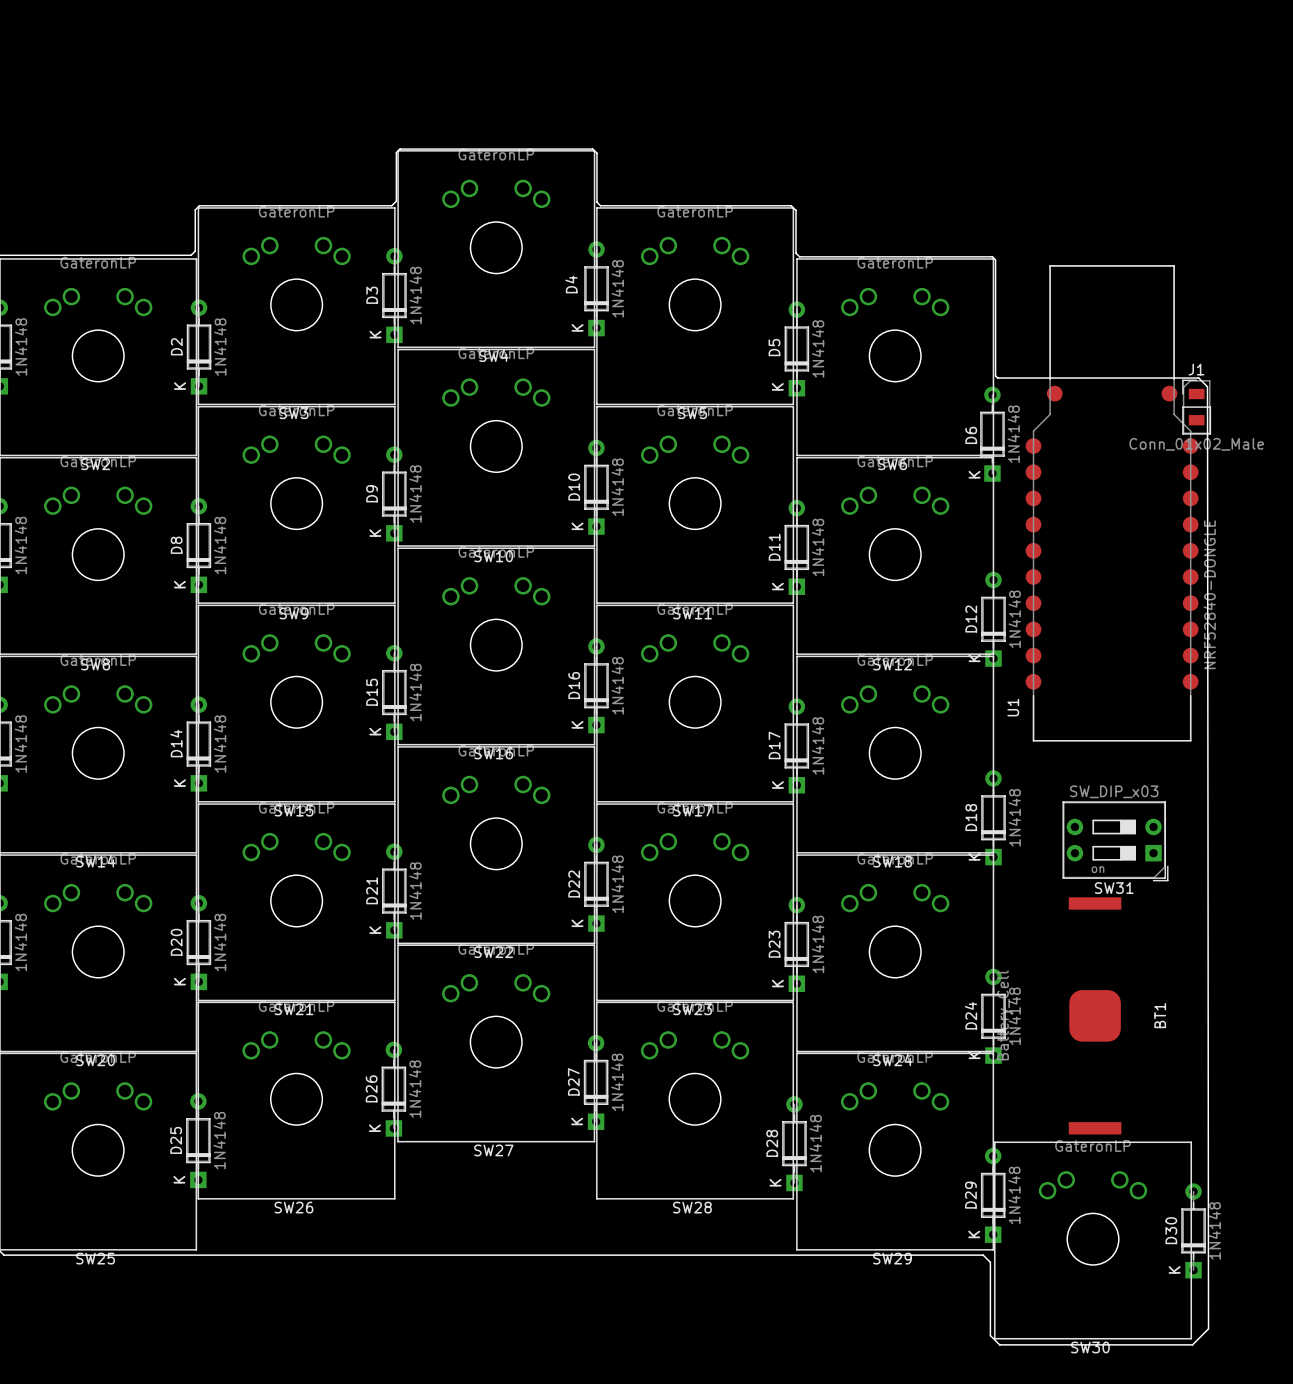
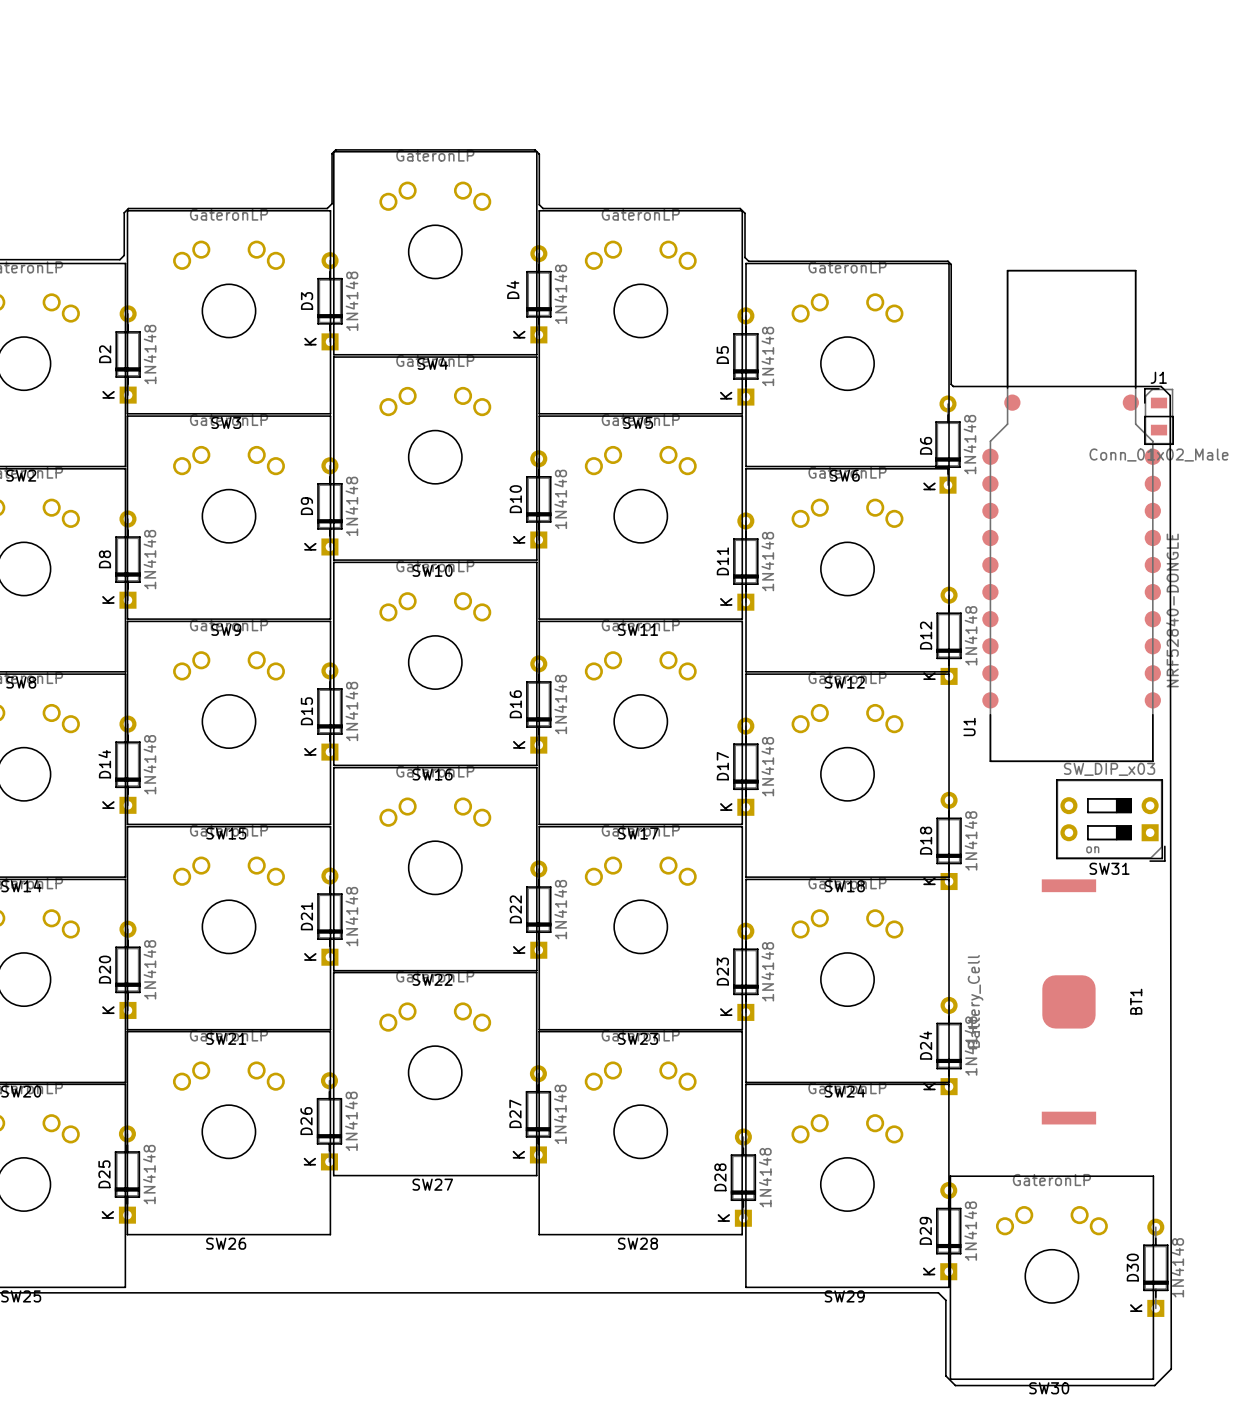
SW31 position: (1115, 841) -> (1110, 820)
BT1 position: (1095, 1015) -> (1068, 1001)

